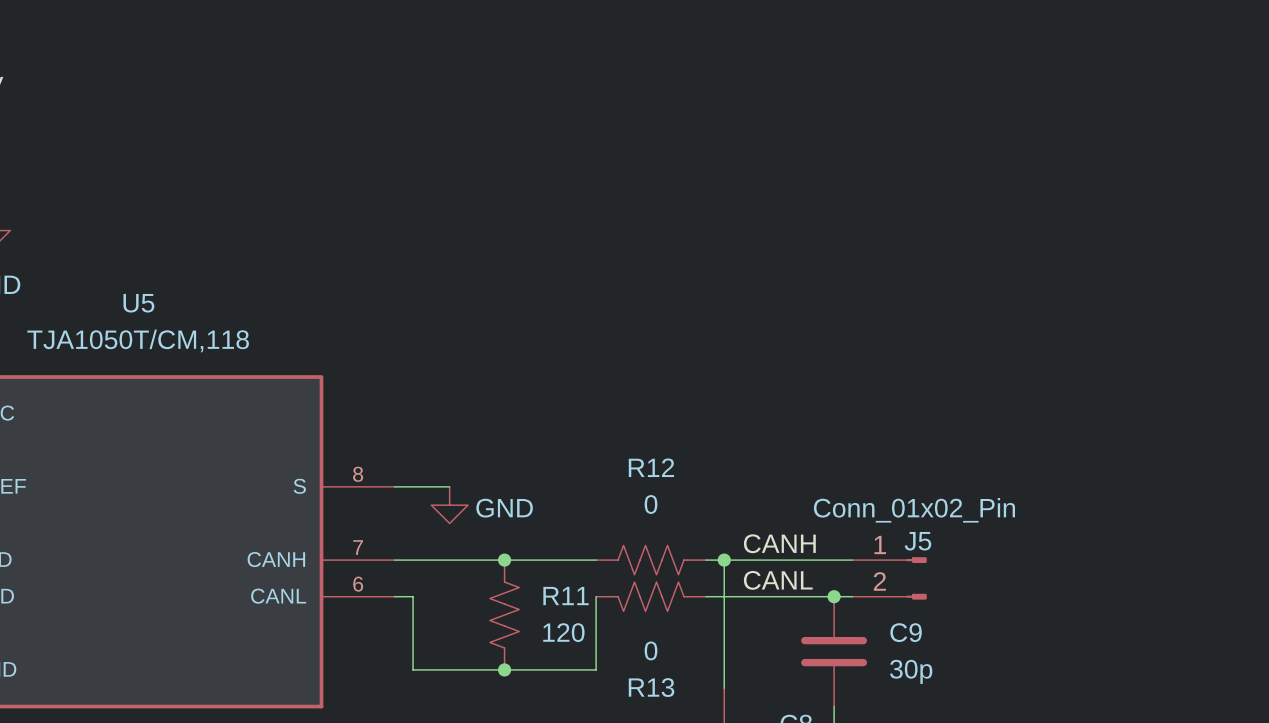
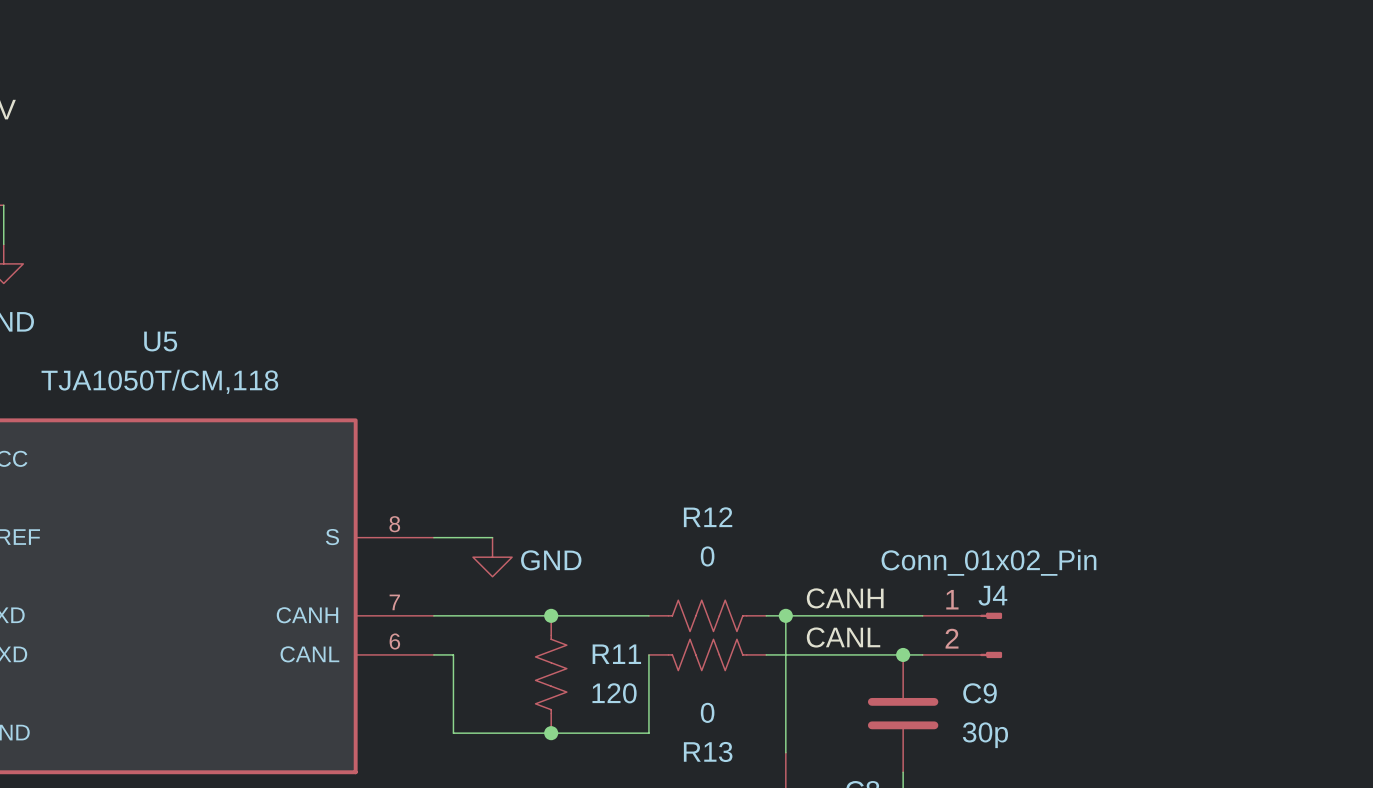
J5 name: J5 (917, 541) -> J4 (992, 595)

